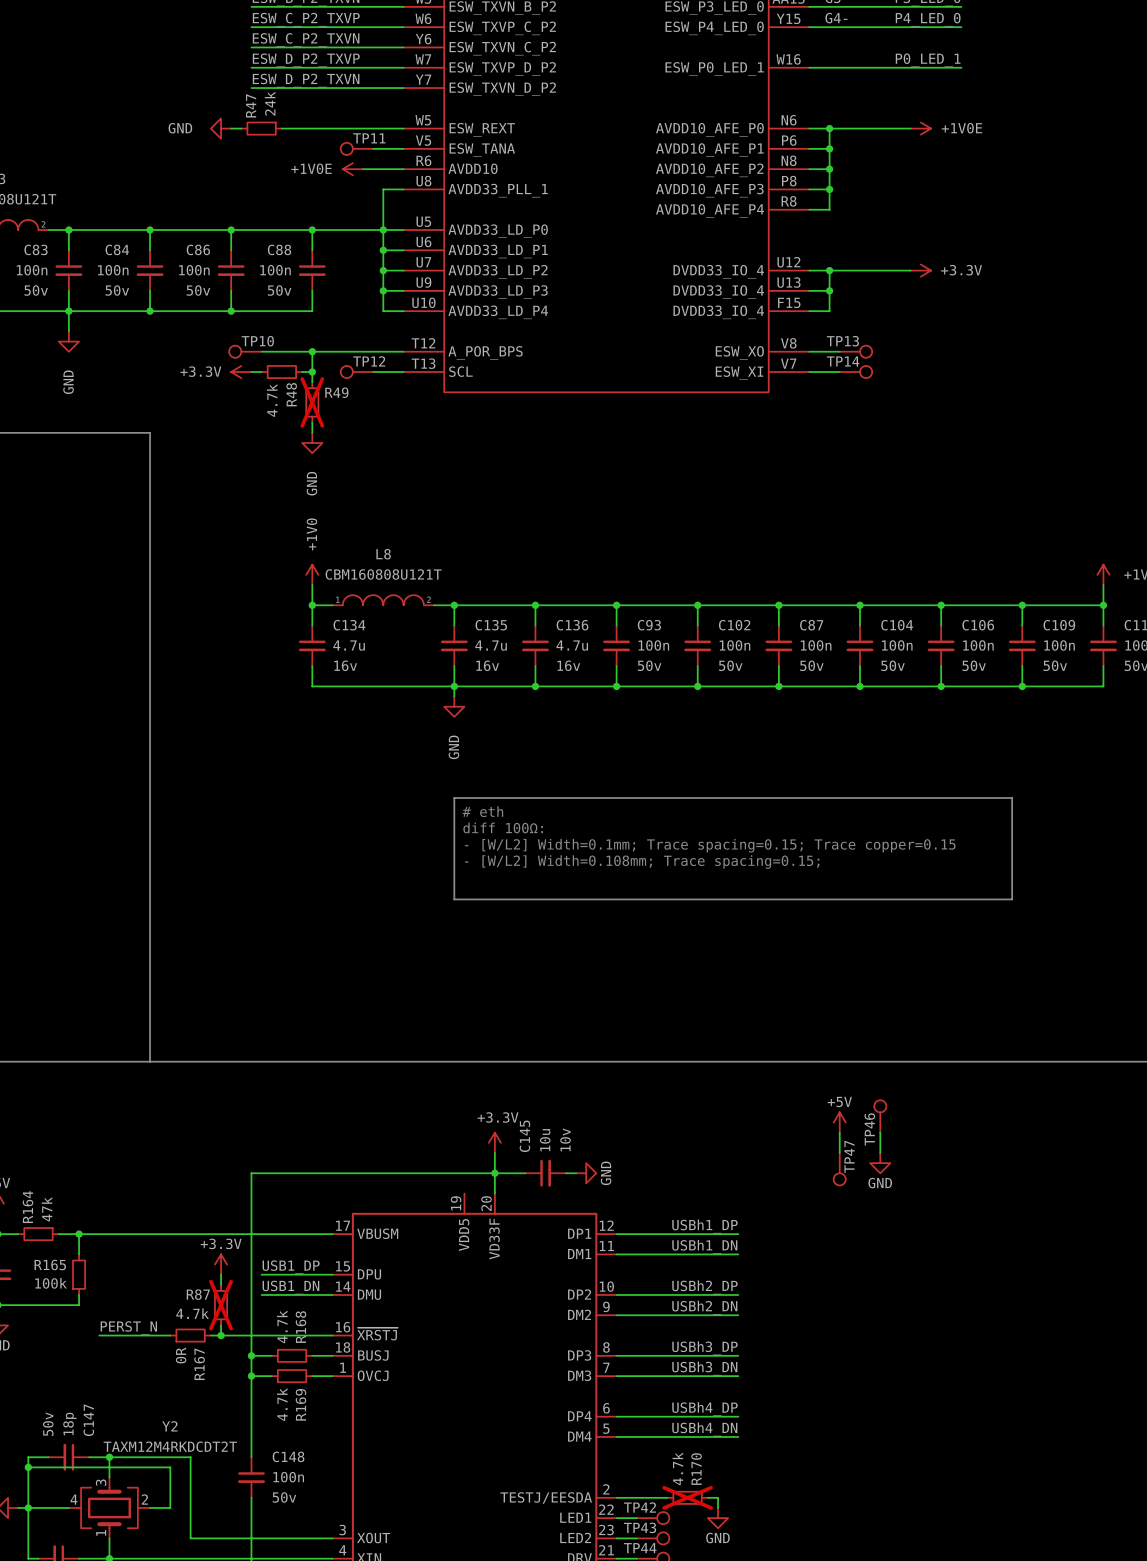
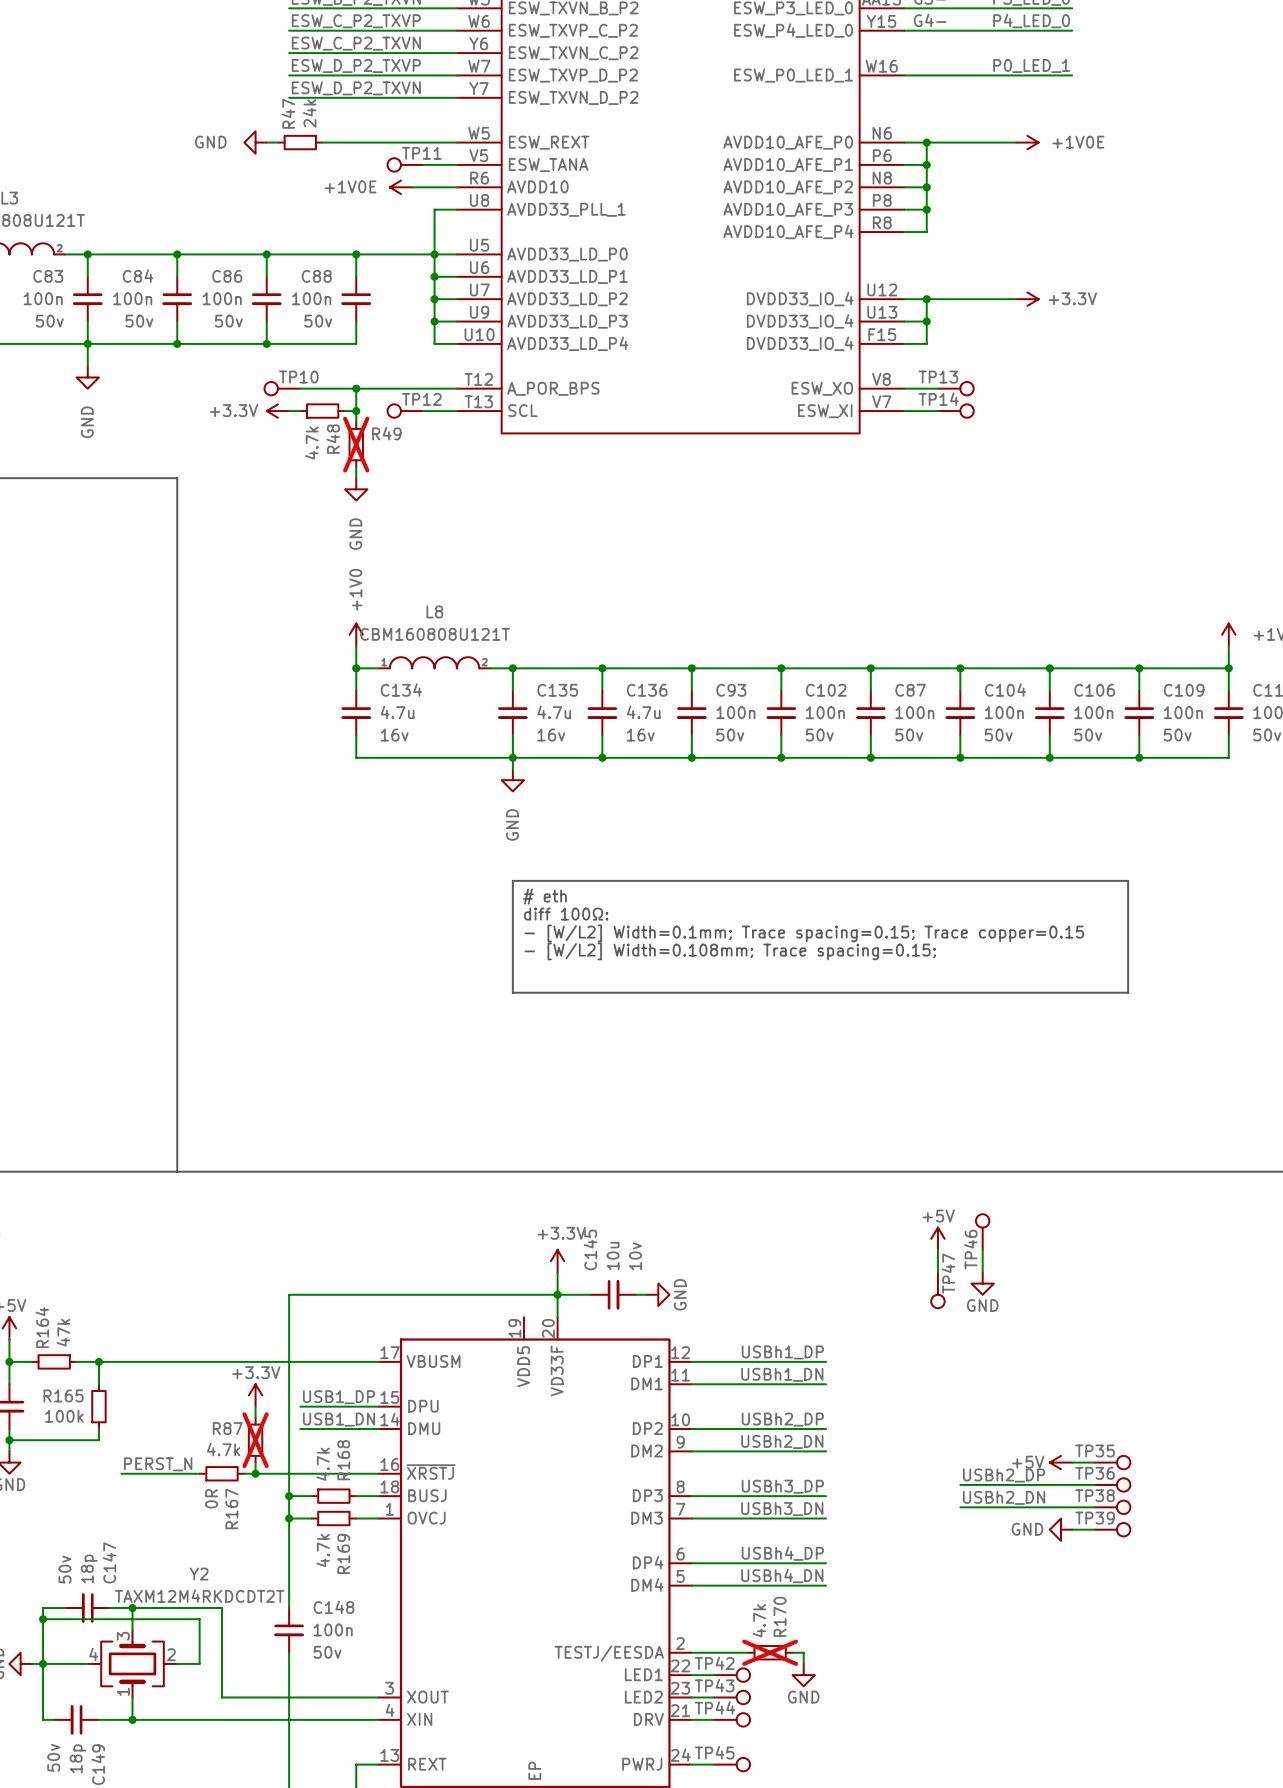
power symbol: none -> +5V (1061, 1462)
wire: none -> (1072, 1462) (1094, 1462)
TP35: none -> (1112, 1462)
label: none -> USBh2_DP (1004, 1475)
wire: none -> (960, 1484) (1094, 1484)
TP36: none -> (1112, 1484)
label: none -> USBh2_DN (1004, 1497)
wire: none -> (960, 1507) (1094, 1507)
TP38: none -> (1112, 1507)
power symbol: none -> GND (1061, 1529)
wire: none -> (1072, 1529) (1094, 1529)
TP39: none -> (1112, 1529)

